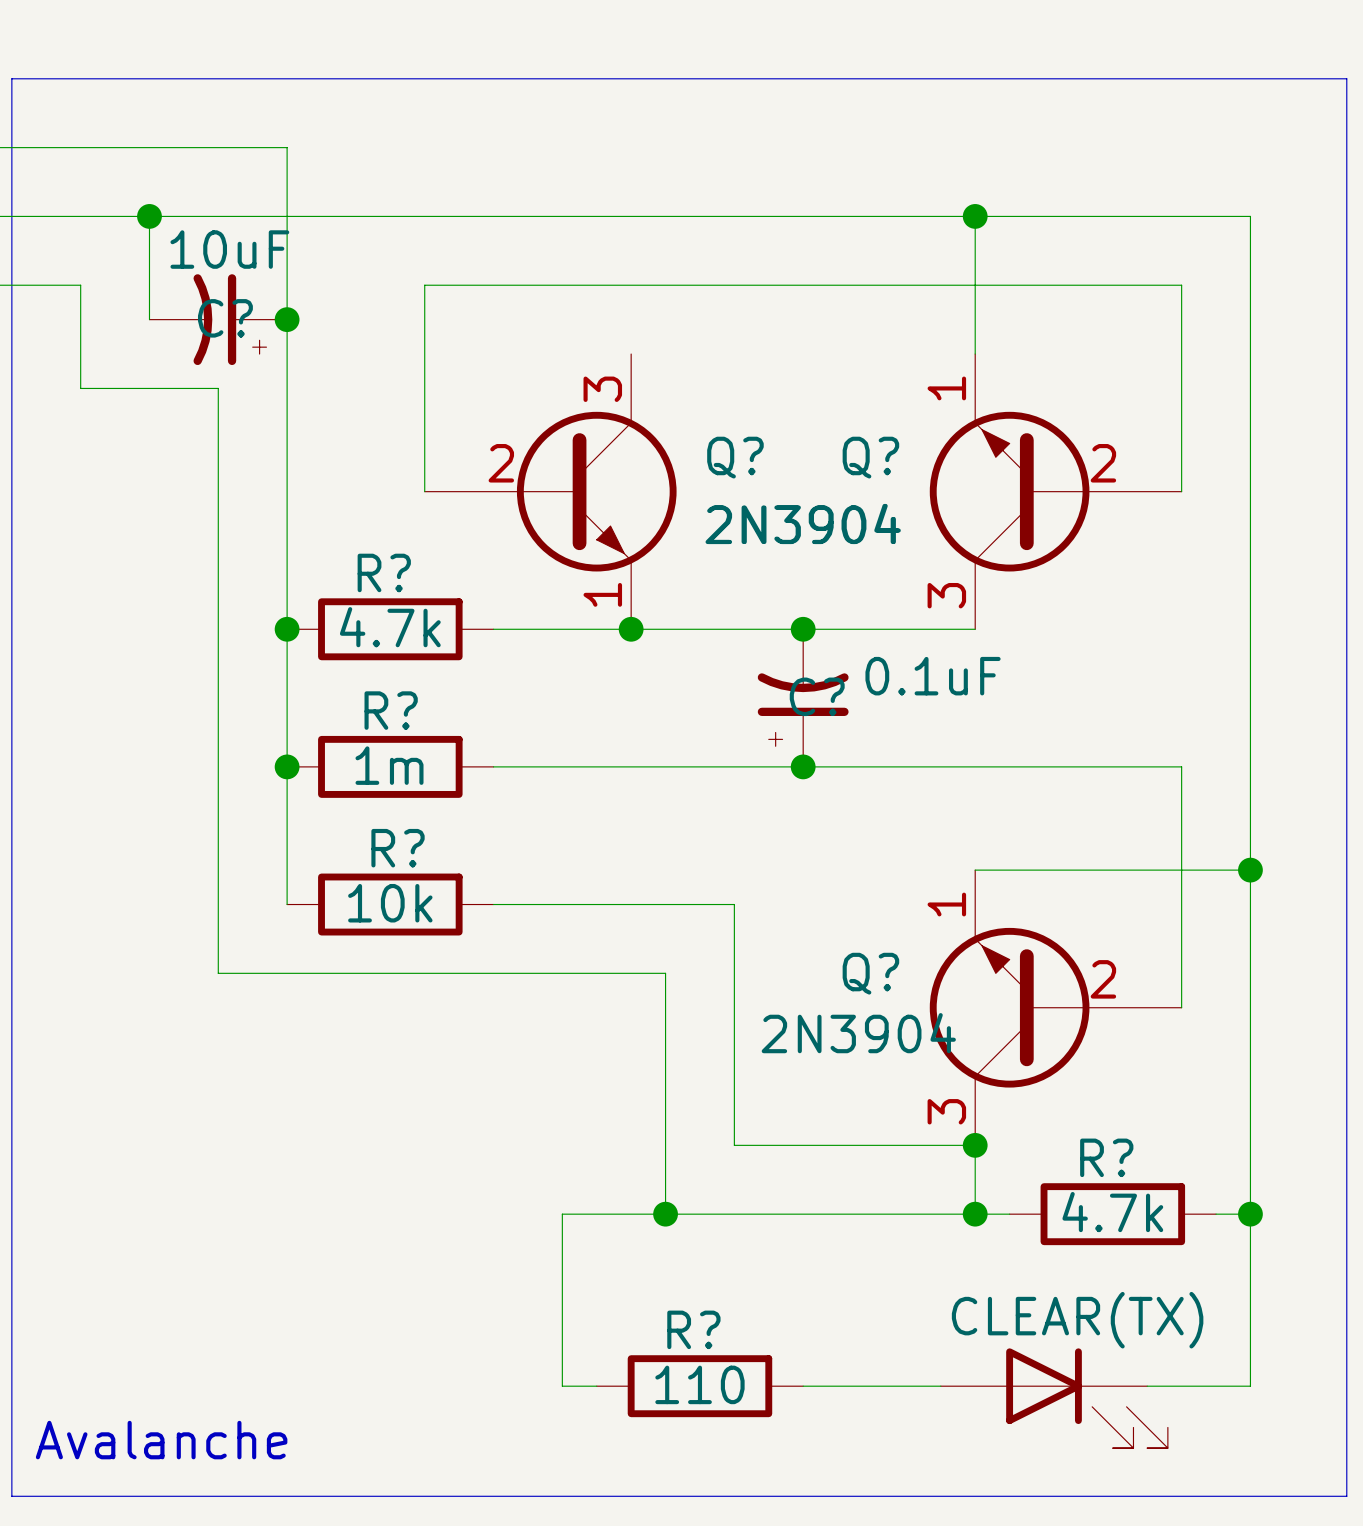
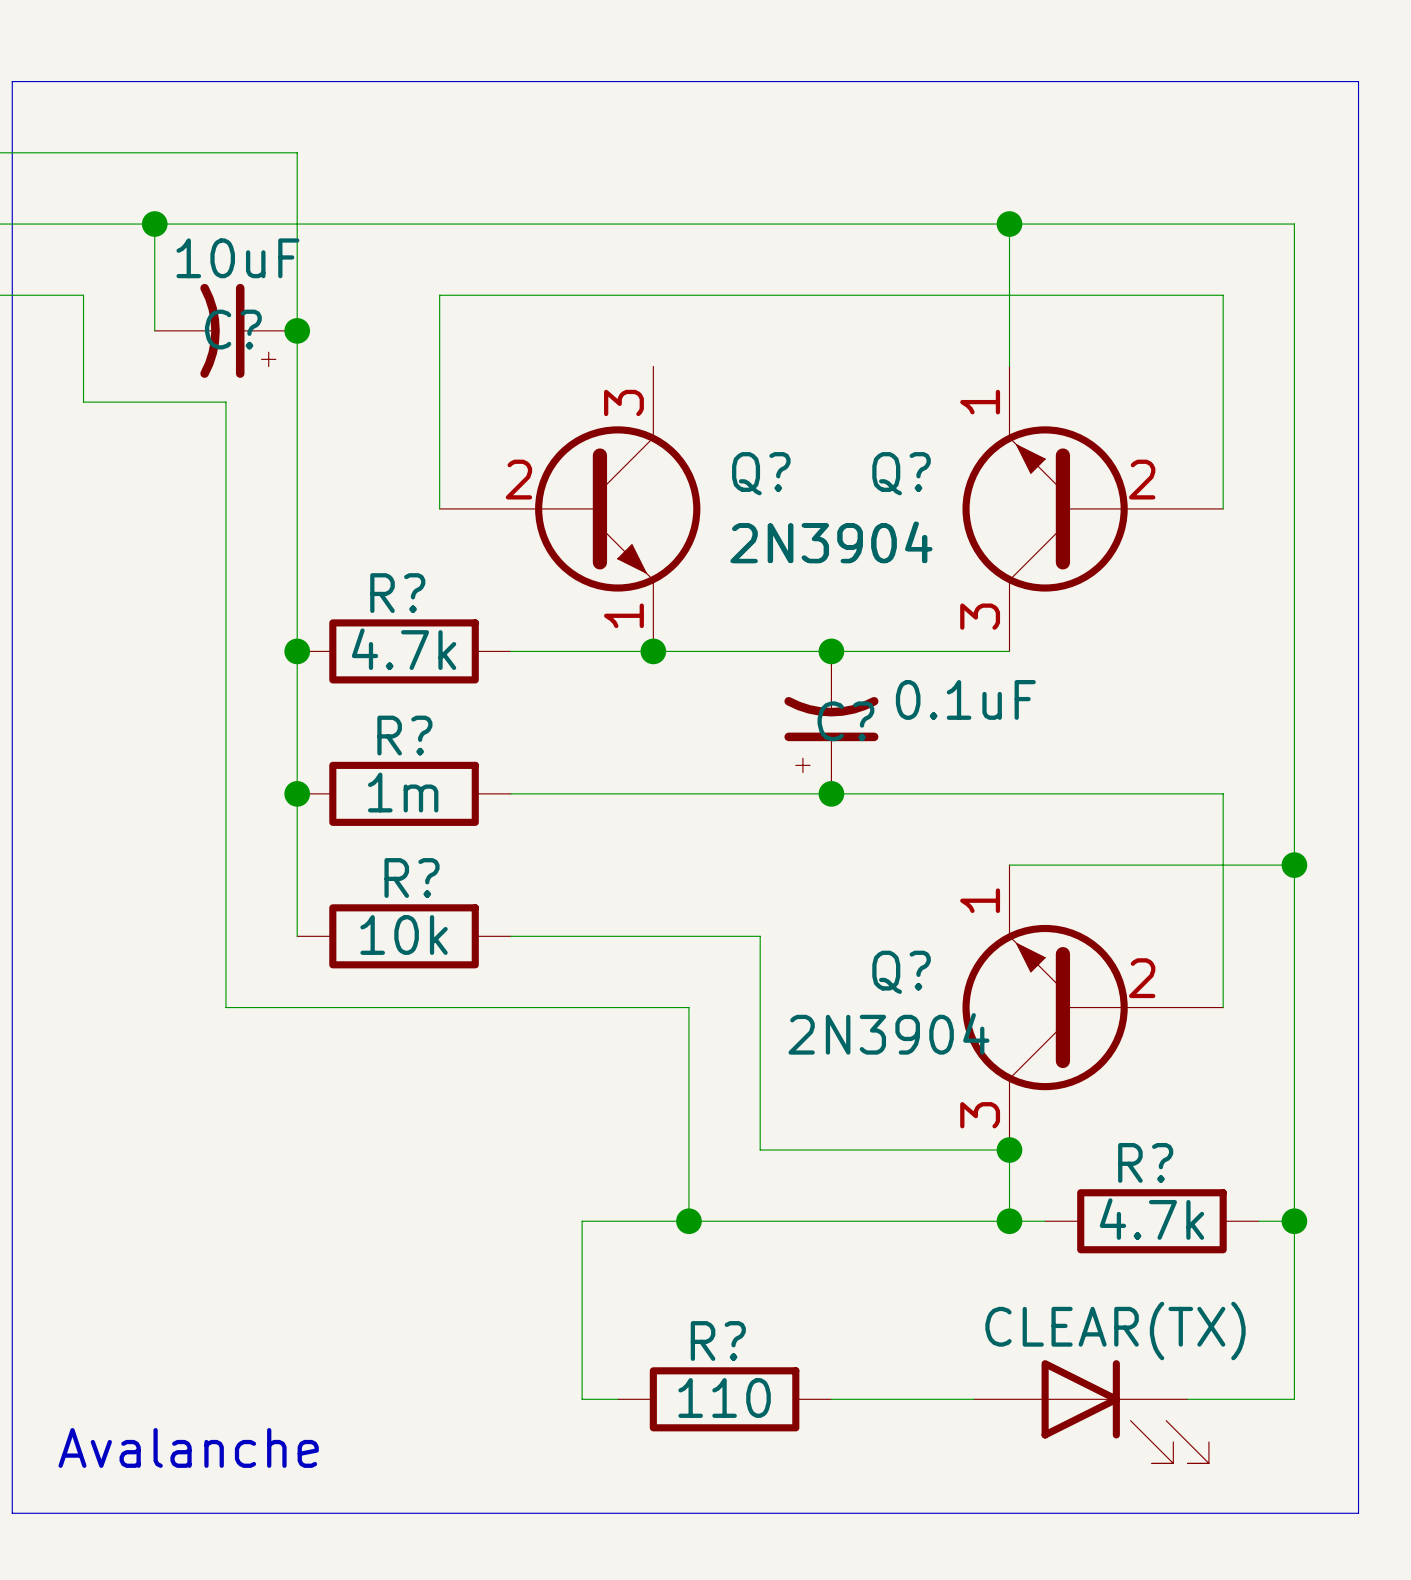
line: (1312, 78) (1346, 78) (1346, 1496) (11, 1496) (11, 1461) -> (1358, 81) (1358, 1513) (12, 1513)
wire: (975, 870) (1250, 870) -> (1009, 865) (1294, 865)
junction position: (1250, 870) -> (1294, 865)
wire: (1181, 973) (1181, 1007) -> none
Q? position: (1055, 1007) -> (1092, 1007)
wire: (734, 1110) (734, 1145) (975, 1145) -> (760, 1150) (1009, 1150) (1009, 1185)
junction: none -> (1009, 1150)
junction: (975, 1145) -> none
wire: (665, 1179) (665, 1214) -> none
wire: (975, 1179) (975, 1214) -> none
junction: none -> (1009, 1221)
wire: (562, 1214) (1009, 1214) -> (582, 1256) (582, 1221) (1045, 1221)
junction position: (665, 1214) -> (688, 1221)
junction: (975, 1214) -> none
R? position: (1112, 1214) -> (1151, 1221)
wire: (1216, 1214) (1250, 1214) -> (1258, 1221) (1294, 1221)
junction position: (1250, 1214) -> (1294, 1221)
wire: (562, 1351) (562, 1386) (596, 1386) -> (582, 1399) (617, 1399)
wire: (1250, 1351) (1250, 1386) (1147, 1386) -> (1294, 1399) (1187, 1399)
R? position: (699, 1386) -> (724, 1399)
wire: (803, 1386) (940, 1386) -> (831, 1399) (973, 1399)
part position: (1054, 1398) -> (1091, 1411)
text position: Avalanche (161, 1440) -> Avalanche (188, 1447)

